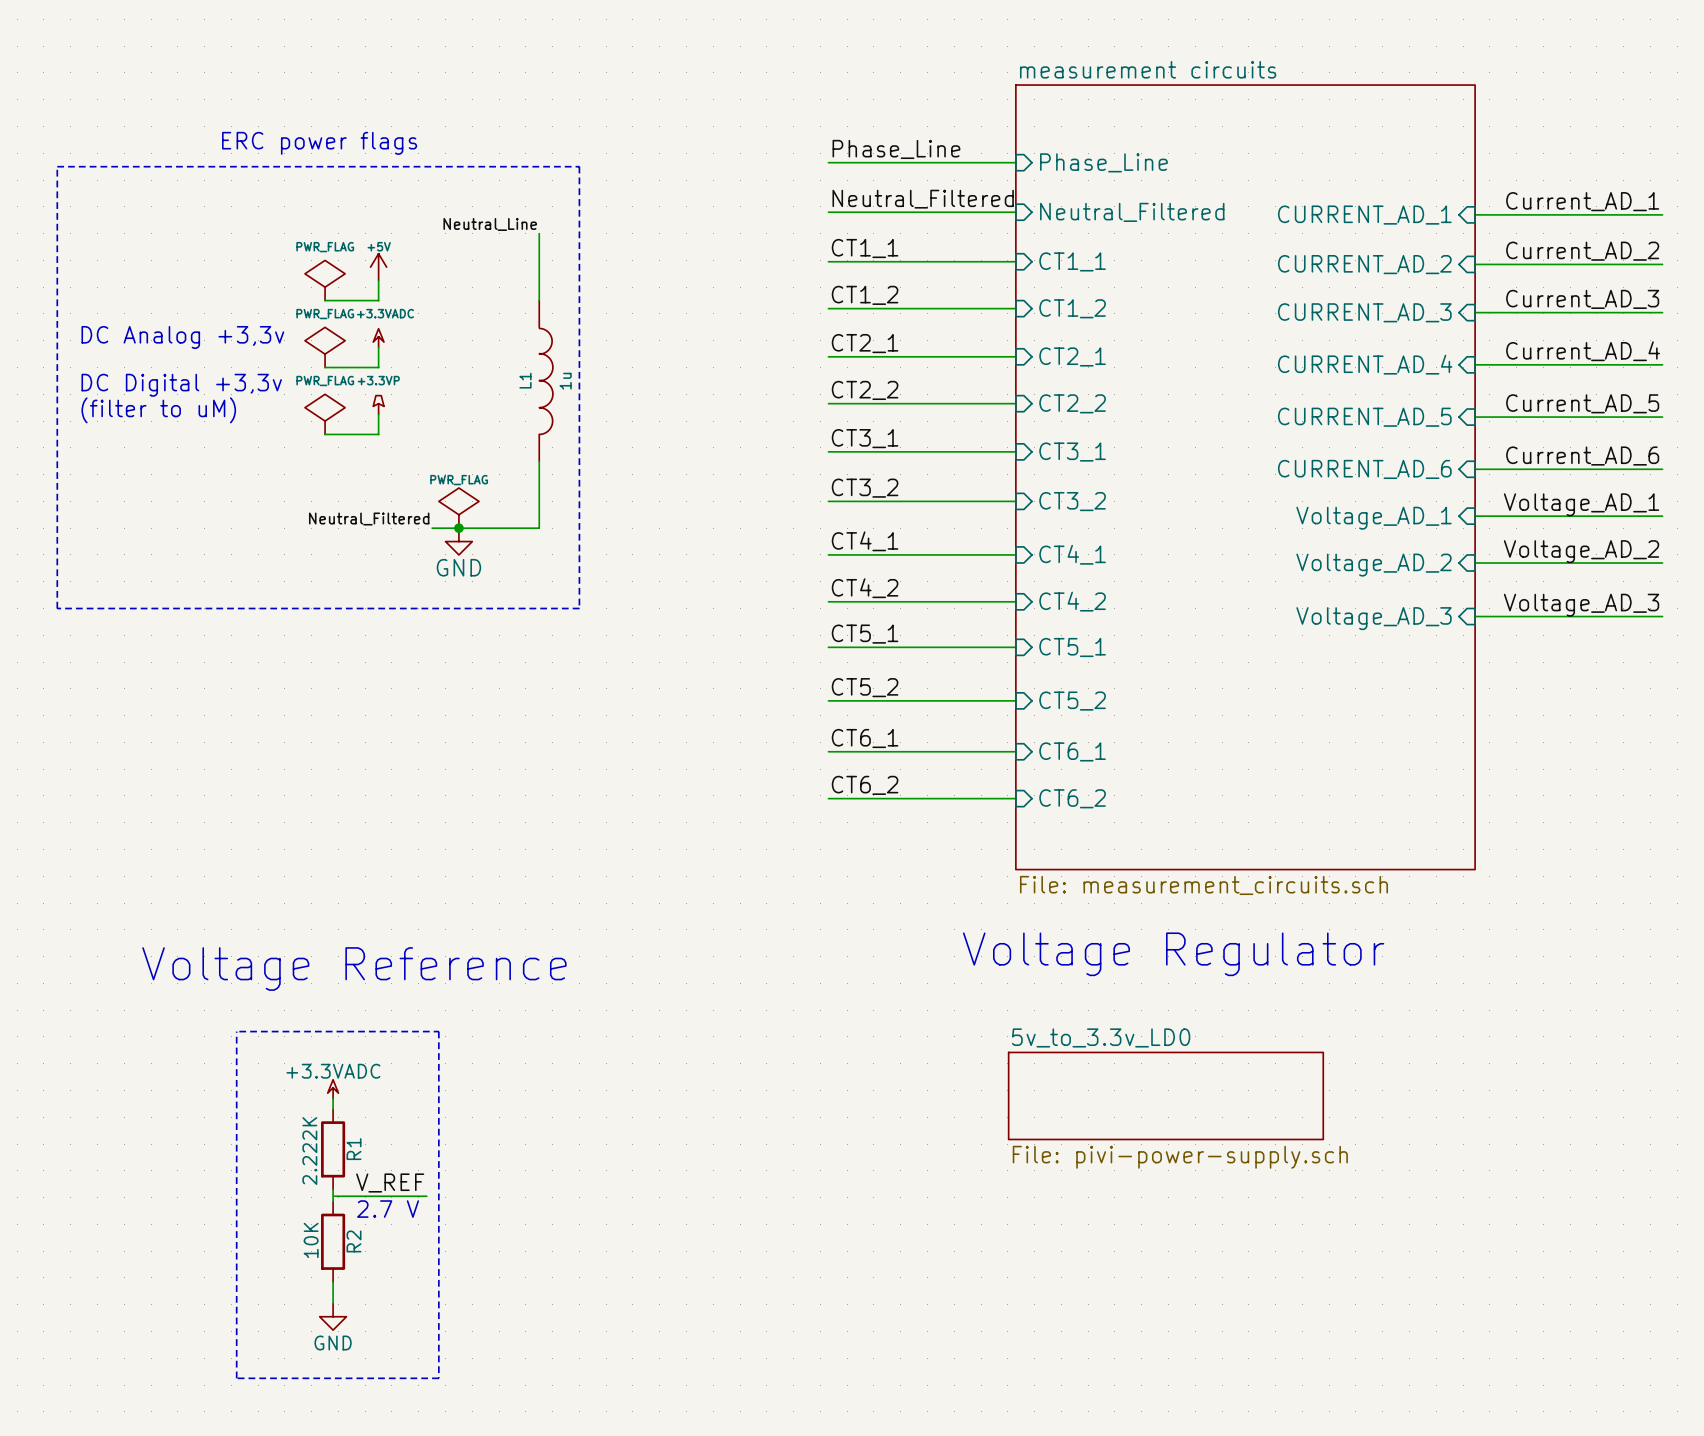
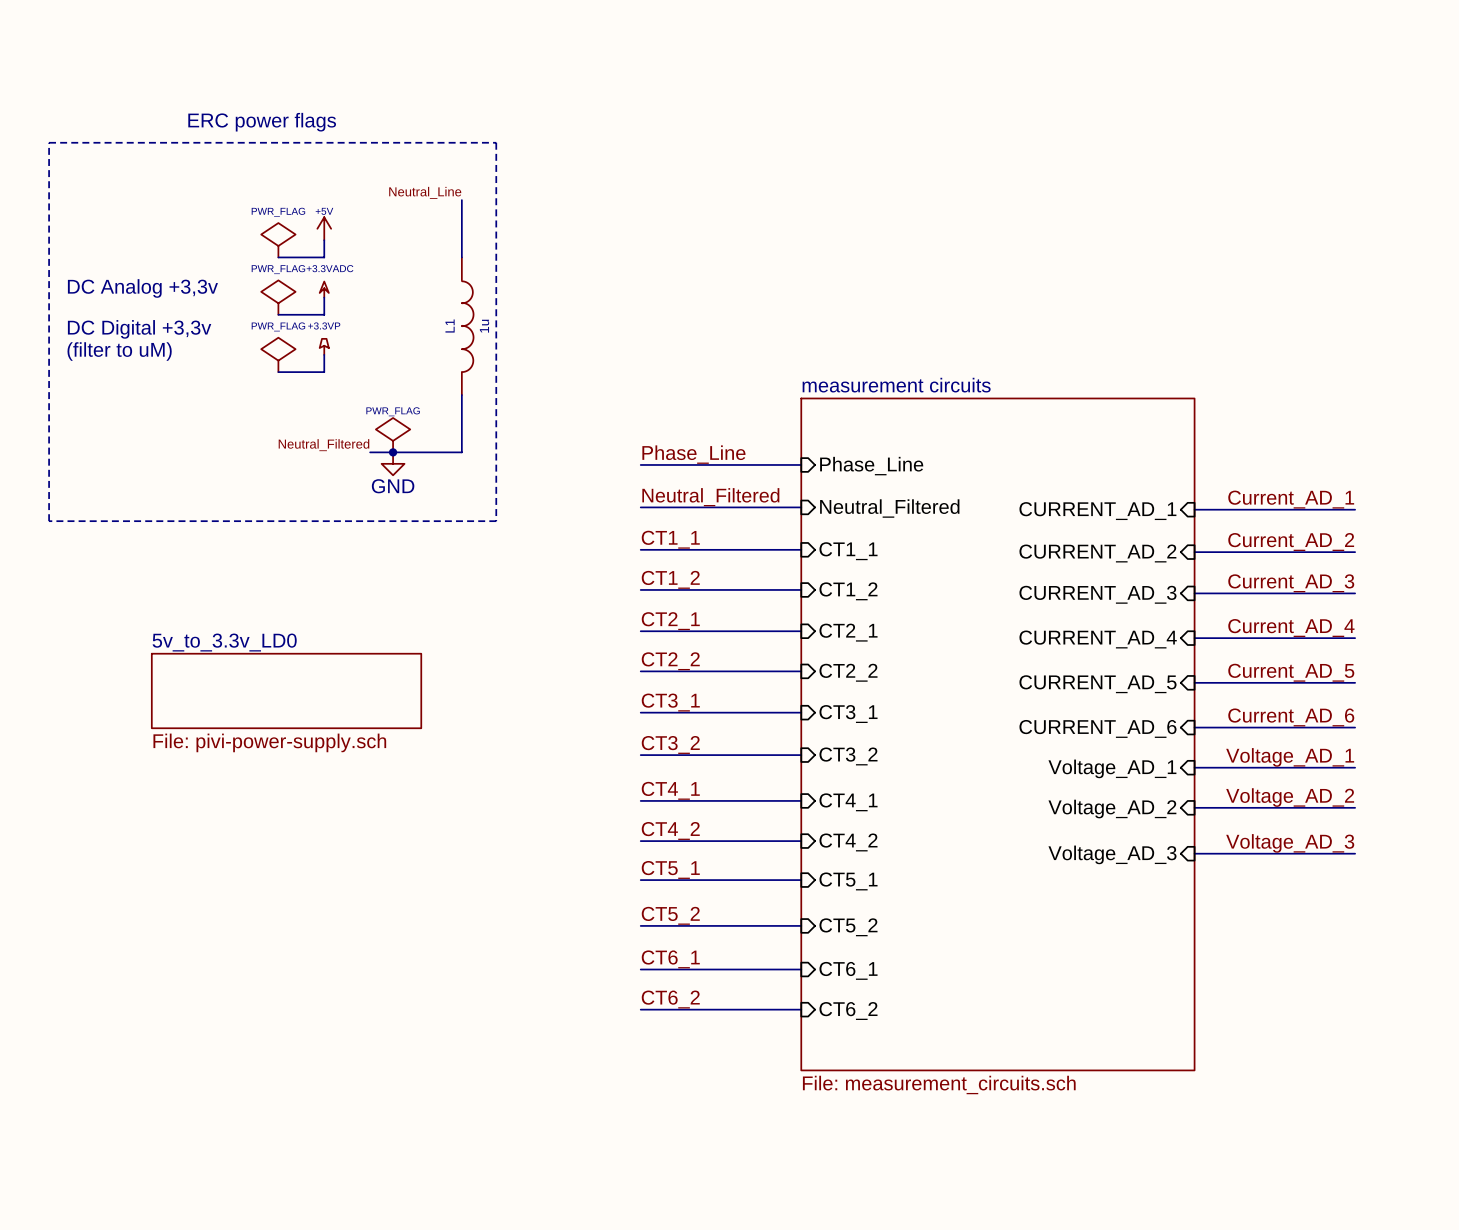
label: Phase_Line (896, 149) -> none
wire: (828, 162) (1015, 162) -> none
sheet pin: Phase_Line (1103, 162) -> none
label: Neutral_Filtered (923, 199) -> none
label: Current_AD_1 (1582, 201) -> none
wire: (828, 212) (1015, 212) -> none
sheet pin: Neutral_Filtered (1132, 212) -> none
wire: (1475, 214) (1662, 214) -> none
sheet pin: CURRENT_AD_1 (1364, 215) -> none
label: CT1_1 (865, 248) -> none
label: Current_AD_2 (1582, 251) -> none
wire: (828, 261) (1015, 261) -> none
sheet pin: CT1_1 (1072, 261) -> none
sheet pin: CURRENT_AD_2 (1364, 264) -> none
wire: (1475, 264) (1662, 264) -> none
label: CT1_2 (865, 295) -> none
label: Current_AD_3 (1582, 299) -> none
wire: (828, 308) (1015, 308) -> (640, 464) (801, 464)
sheet pin: CT1_2 (1072, 308) -> none
sheet pin: CURRENT_AD_3 (1364, 312) -> none
wire: (1475, 312) (1662, 312) -> none
label: CT2_1 (865, 343) -> none
label: Current_AD_4 (1583, 351) -> none
wire: (828, 356) (1015, 356) -> none
sheet pin: CT2_1 (1072, 356) -> none
sheet pin: CURRENT_AD_4 (1365, 364) -> none
wire: (1475, 364) (1662, 364) -> (1194, 509) (1355, 509)
label: CT2_2 (865, 390) -> none
wire: (828, 403) (1015, 403) -> none
sheet pin: CT2_2 (1072, 403) -> none
label: Current_AD_5 (1582, 403) -> none
sheet pin: CURRENT_AD_5 (1364, 417) -> none
wire: (1475, 417) (1662, 417) -> none
label: CT3_1 (865, 438) -> none
wire: (828, 451) (1015, 451) -> (640, 549) (801, 549)
sheet pin: CT3_1 (1072, 452) -> none
label: Current_AD_6 (1582, 456) -> none
sheet pin: CURRENT_AD_6 (1364, 469) -> none
wire: (1475, 469) (1662, 469) -> (1194, 593) (1355, 593)
sheet measurement circuits: File: measurement_circuits.sch (1245, 477) -> none
label: CT3_2 (865, 488) -> none
wire: (828, 501) (1015, 501) -> (640, 507) (801, 507)
sheet pin: CT3_2 (1072, 501) -> none
label: Voltage_AD_1 (1581, 504) -> none
wire: (1475, 516) (1662, 516) -> (1194, 638) (1355, 638)
sheet pin: Voltage_AD_1 (1374, 518) -> none
label: none -> Phase_Line (693, 454)
label: CT4_1 (865, 541) -> none
sheet pin: none -> Phase_Line (871, 466)
label: Voltage_AD_2 (1581, 551) -> none
wire: (828, 554) (1015, 554) -> (640, 631) (801, 631)
sheet pin: CT4_1 (1072, 554) -> none
wire: (1475, 562) (1662, 562) -> (1194, 682) (1355, 682)
sheet pin: Voltage_AD_2 (1374, 565) -> none
label: none -> Neutral_Filtered (710, 497)
label: none -> Current_AD_1 (1291, 499)
label: CT4_2 (865, 588) -> none
sheet pin: none -> Neutral_Filtered (889, 508)
sheet pin: none -> CURRENT_AD_1 (1097, 511)
wire: (828, 601) (1015, 601) -> (640, 671) (801, 671)
sheet pin: CT4_2 (1072, 601) -> none
label: Voltage_AD_3 (1581, 605) -> none
wire: (1475, 616) (1662, 616) -> (1194, 552) (1355, 552)
sheet pin: Voltage_AD_3 (1374, 618) -> none
label: none -> Current_AD_2 (1291, 542)
label: CT5_1 (865, 634) -> CT1_1 (670, 539)
sheet pin: none -> CURRENT_AD_2 (1097, 553)
wire: (828, 647) (1015, 647) -> (640, 755) (801, 755)
sheet pin: CT5_1 (1072, 647) -> CT1_1 (848, 551)
label: none -> Current_AD_3 (1291, 583)
label: CT5_2 (865, 687) -> CT1_2 (670, 579)
wire: none -> (640, 589) (801, 589)
sheet pin: none -> CURRENT_AD_3 (1097, 594)
wire: (828, 700) (1015, 700) -> (640, 800) (801, 800)
sheet pin: CT5_2 (1072, 701) -> CT1_2 (848, 591)
label: none -> Current_AD_4 (1291, 628)
label: CT6_1 (865, 738) -> CT2_1 (670, 621)
sheet pin: none -> CURRENT_AD_4 (1098, 639)
wire: (828, 751) (1015, 751) -> (640, 841) (801, 841)
sheet pin: CT6_1 (1072, 751) -> CT2_1 (848, 632)
label: none -> Current_AD_5 (1291, 672)
label: CT6_2 (865, 785) -> CT2_2 (670, 661)
sheet pin: none -> CURRENT_AD_5 (1098, 684)
wire: (828, 798) (1015, 798) -> (640, 880) (801, 880)
sheet pin: CT6_2 (1072, 798) -> CT2_2 (848, 672)
label: none -> CT3_1 (670, 702)
wire: none -> (640, 712) (801, 712)
sheet pin: none -> CT3_1 (848, 714)
label: none -> Current_AD_6 (1291, 717)
sheet pin: none -> CURRENT_AD_6 (1097, 728)
wire: none -> (1194, 727) (1355, 727)
sheet measurement circuits: none -> File: measurement_circuits.sch (997, 734)
label: none -> CT3_2 (670, 744)
sheet pin: none -> CT3_2 (848, 756)
label: none -> Voltage_AD_1 (1290, 757)
wire: none -> (1194, 767) (1355, 767)
sheet pin: none -> Voltage_AD_1 (1112, 768)
label: none -> CT4_1 (670, 790)
label: none -> Voltage_AD_2 (1290, 797)
sheet pin: none -> CT4_1 (848, 802)
wire: none -> (1194, 807) (1355, 807)
sheet pin: none -> Voltage_AD_2 (1112, 809)
text: Voltage Regulator (1173, 954) -> none
label: none -> CT4_2 (670, 830)
text: Voltage Reference (354, 969) -> none
sheet pin: none -> CT4_2 (848, 842)
label: none -> Voltage_AD_3 (1290, 843)
wire: none -> (1194, 853) (1355, 853)
sheet pin: none -> Voltage_AD_3 (1112, 854)
label: none -> CT5_1 (670, 869)
sheet pin: none -> CT5_1 (848, 881)
line: (236, 1031) (236, 1378) (438, 1378) (438, 1031) (239, 1031) -> none
label: none -> CT5_2 (670, 915)
wire: none -> (640, 925) (801, 925)
sheet pin: none -> CT5_2 (848, 927)
power symbol: +3.3VADC (333, 1089) -> none
sheet 5v_to_3.3v_LD0 position: (1165, 1095) -> (286, 690)
wire: (333, 1098) (333, 1109) -> none
label: none -> CT6_1 (670, 959)
wire: none -> (640, 969) (801, 969)
sheet pin: none -> CT6_1 (848, 970)
R1: 2.222K (333, 1149) -> none
label: none -> CT6_2 (670, 999)
wire: none -> (640, 1009) (801, 1009)
sheet pin: none -> CT6_2 (848, 1011)
label: V_REF (390, 1182) -> none
wire: (333, 1189) (333, 1201) -> none
wire: (334, 1196) (426, 1196) -> none
text: 2.7 V (388, 1209) -> none
R2: 10K (333, 1241) -> none
wire: (333, 1281) (333, 1303) -> none
power symbol: GND (333, 1316) -> none

